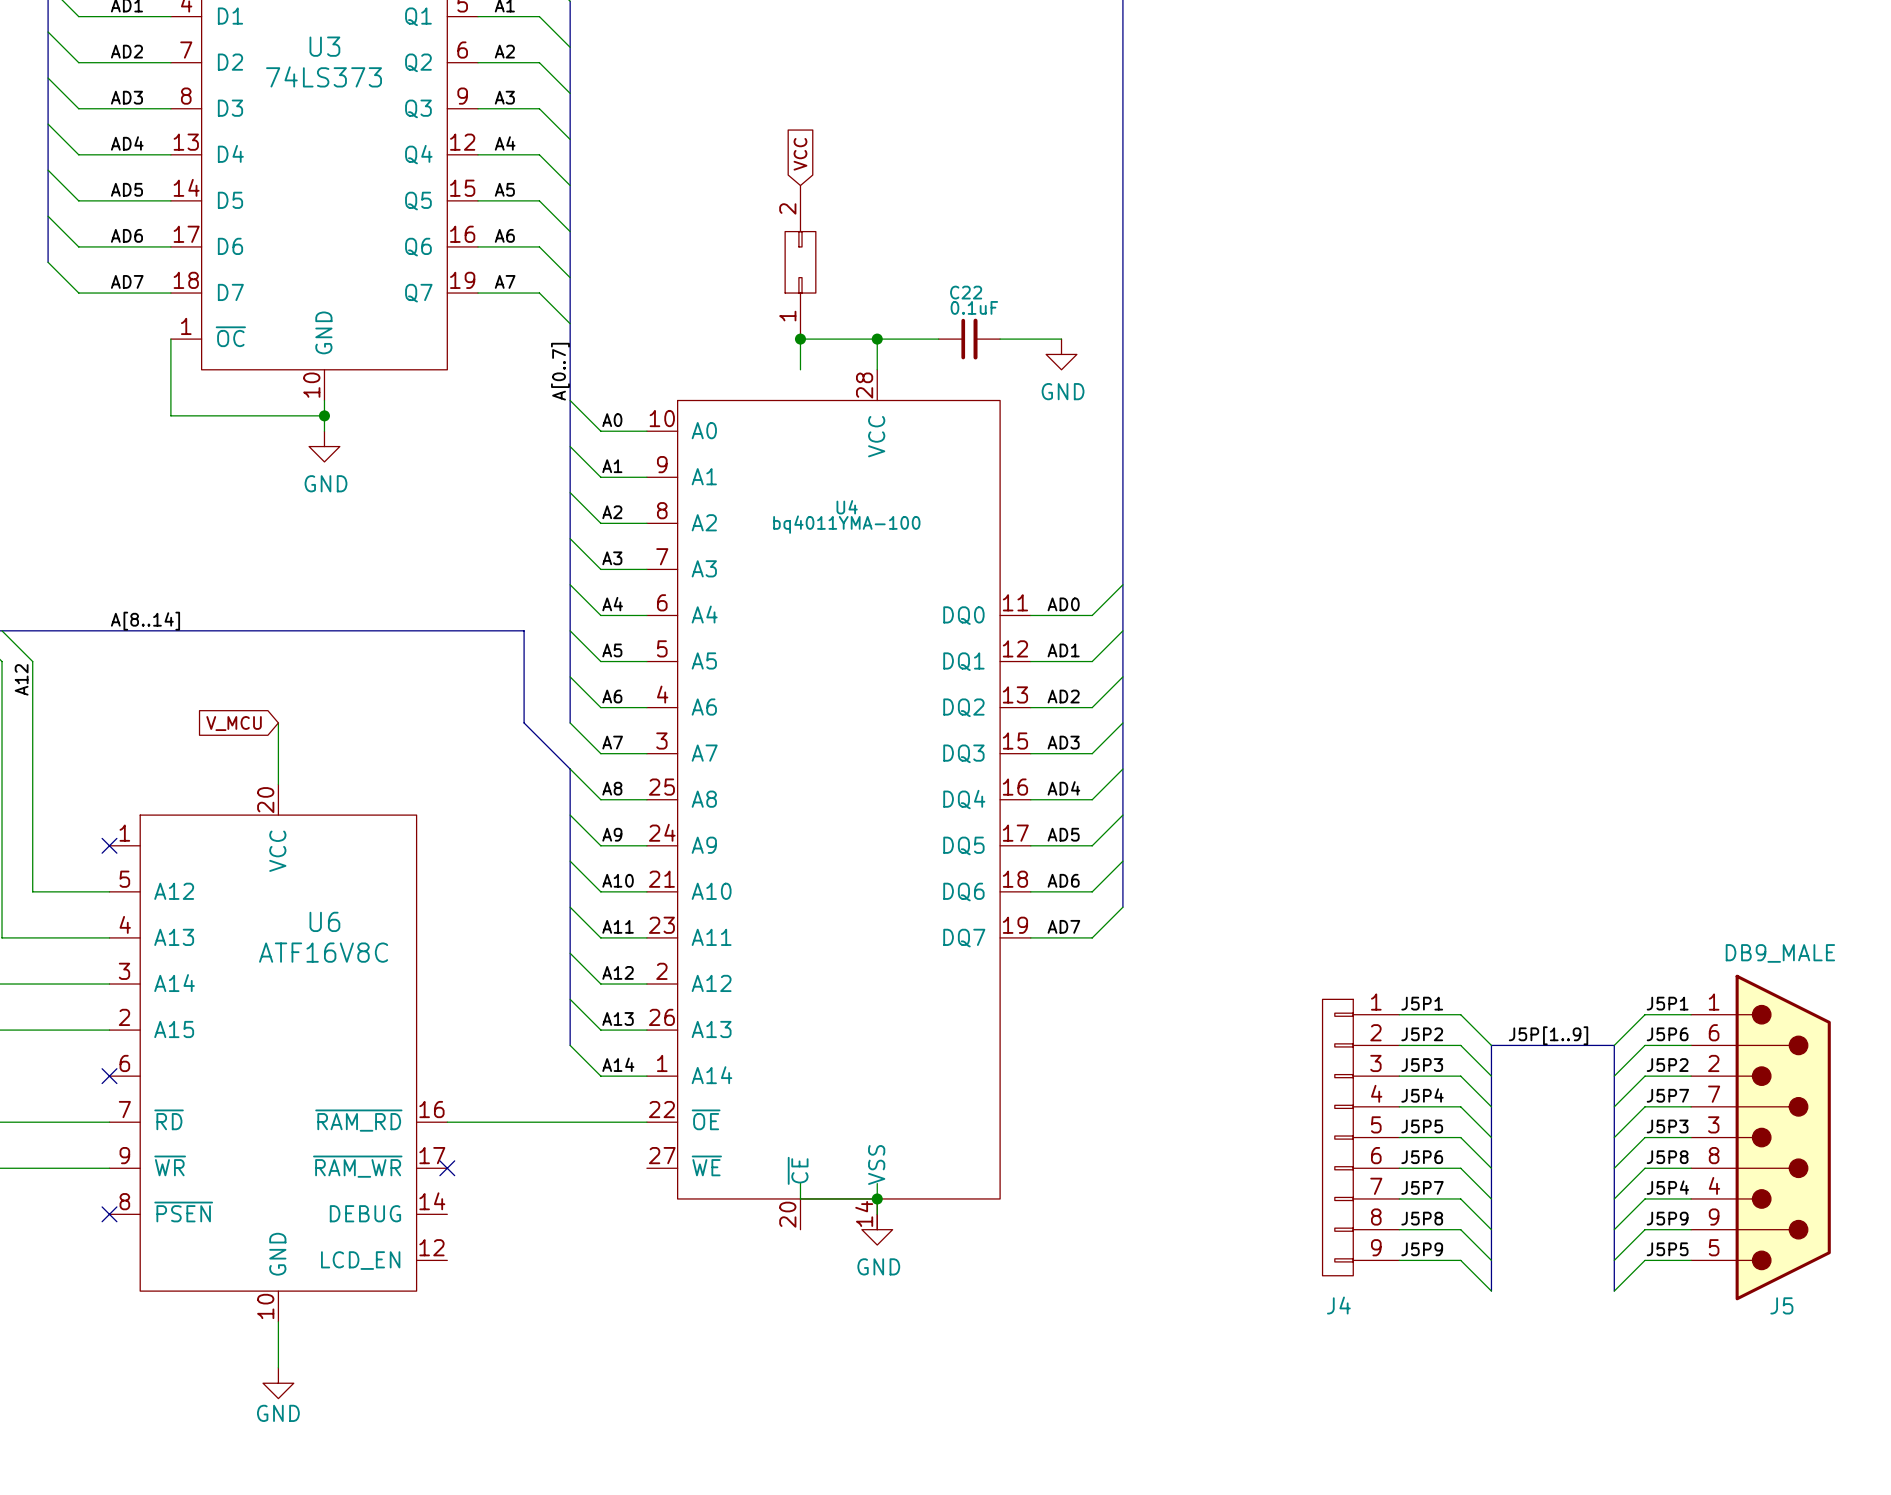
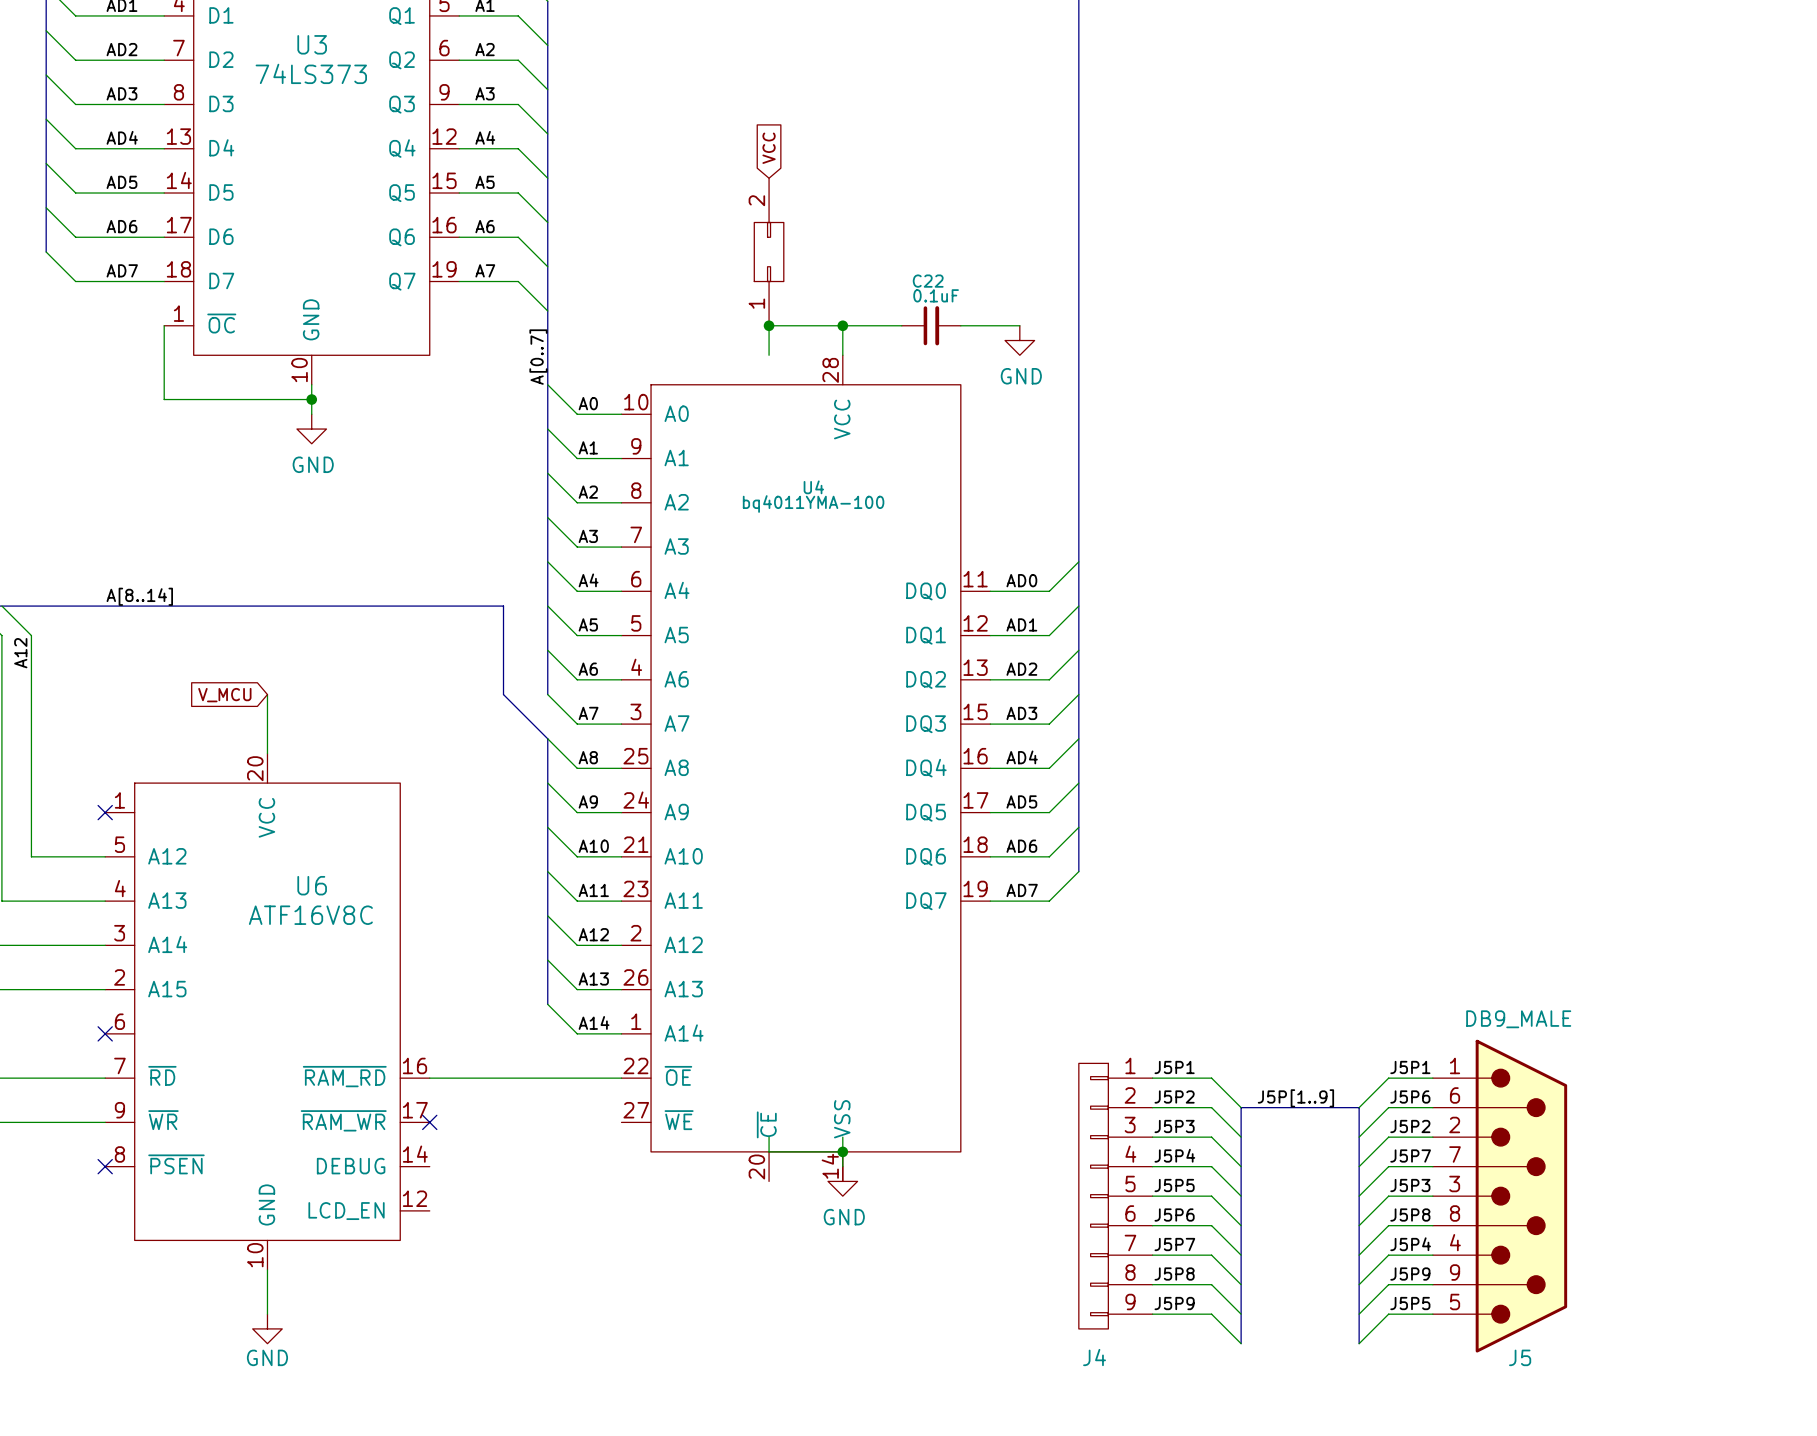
label: J5P1 (1422, 1003) -> none
label: J5P1 (1667, 1003) -> none
wire: (1399, 1014) (1460, 1014) (1491, 1045) -> (1152, 1078) (1211, 1078) (1241, 1107)
wire: (1691, 1014) (1645, 1014) (1614, 1045) -> (1432, 1078) (1388, 1078) (1359, 1107)
label: J5P2 (1422, 1034) -> none
label: J5P6 (1667, 1034) -> none
label position: J5P[1..9] (1548, 1035) -> J5P[1..9] (1295, 1098)
wire: (1399, 1045) (1460, 1045) (1491, 1076) -> (1152, 1107) (1211, 1107) (1241, 1137)
wire: (1691, 1045) (1645, 1045) (1614, 1076) -> (1432, 1107) (1388, 1107) (1359, 1137)
label: J5P3 (1422, 1065) -> none
label: J5P2 (1667, 1065) -> none
wire: (1399, 1076) (1460, 1076) (1491, 1106) -> (1152, 1137) (1211, 1137) (1241, 1166)
wire: (1691, 1076) (1645, 1076) (1614, 1106) -> (1432, 1137) (1388, 1137) (1359, 1166)
label: J5P4 (1422, 1095) -> none
label: J5P7 (1667, 1095) -> none
wire: (1399, 1106) (1460, 1106) (1491, 1137) -> (1152, 1166) (1211, 1166) (1241, 1196)
wire: (1691, 1106) (1645, 1106) (1614, 1137) -> (1432, 1166) (1388, 1166) (1359, 1196)
label: none -> J5P1 (1174, 1067)
label: none -> J5P1 (1410, 1067)
label: J5P5 (1422, 1126) -> none
label: J5P3 (1667, 1126) -> none
J4 position: (1360, 1137) -> (1115, 1196)
wire: (1399, 1137) (1460, 1137) (1491, 1168) -> (1152, 1196) (1211, 1196) (1241, 1225)
wire: (1691, 1137) (1645, 1137) (1614, 1168) -> (1432, 1196) (1388, 1196) (1359, 1225)
J5 position: (1760, 1137) -> (1500, 1196)
label: none -> J5P2 (1174, 1096)
label position: J5P6 (1422, 1157) -> J5P6 (1410, 1096)
label: J5P8 (1667, 1157) -> none
wire: (1399, 1168) (1460, 1168) (1491, 1198) -> (1152, 1225) (1211, 1225) (1241, 1255)
wire: (1691, 1168) (1645, 1168) (1614, 1198) -> (1432, 1225) (1388, 1225) (1359, 1255)
label: none -> J5P3 (1174, 1126)
label: none -> J5P2 (1410, 1126)
label position: J5P7 (1422, 1187) -> J5P7 (1410, 1155)
label: J5P4 (1667, 1187) -> none
wire: (1399, 1198) (1460, 1198) (1491, 1229) -> (1152, 1255) (1211, 1255) (1241, 1284)
wire: (1691, 1198) (1645, 1198) (1614, 1229) -> (1432, 1255) (1388, 1255) (1359, 1284)
label: none -> J5P4 (1174, 1155)
label position: J5P8 (1422, 1218) -> J5P8 (1410, 1215)
label: J5P9 (1667, 1218) -> none
wire: (1399, 1229) (1460, 1229) (1491, 1260) -> (1152, 1284) (1211, 1284) (1241, 1314)
wire: (1691, 1229) (1645, 1229) (1614, 1260) -> (1432, 1284) (1388, 1284) (1359, 1314)
label: none -> J5P5 (1174, 1185)
label: J5P9 (1422, 1249) -> J5P3 (1410, 1185)
label: J5P5 (1667, 1249) -> none
wire: (1399, 1260) (1460, 1260) (1491, 1291) -> (1152, 1314) (1211, 1314) (1241, 1343)
wire: (1691, 1260) (1645, 1260) (1614, 1291) -> (1432, 1314) (1388, 1314) (1359, 1343)
label: none -> J5P6 (1174, 1215)
bus: (1491, 1291) (1491, 1045) (1614, 1045) (1614, 1291) -> (1241, 1343) (1241, 1107) (1359, 1107) (1359, 1343)
label: none -> J5P7 (1174, 1244)
label: none -> J5P4 (1410, 1244)
label: none -> J5P8 (1174, 1274)
label: none -> J5P9 (1410, 1274)
label: none -> J5P9 (1174, 1303)
label: none -> J5P5 (1410, 1303)

